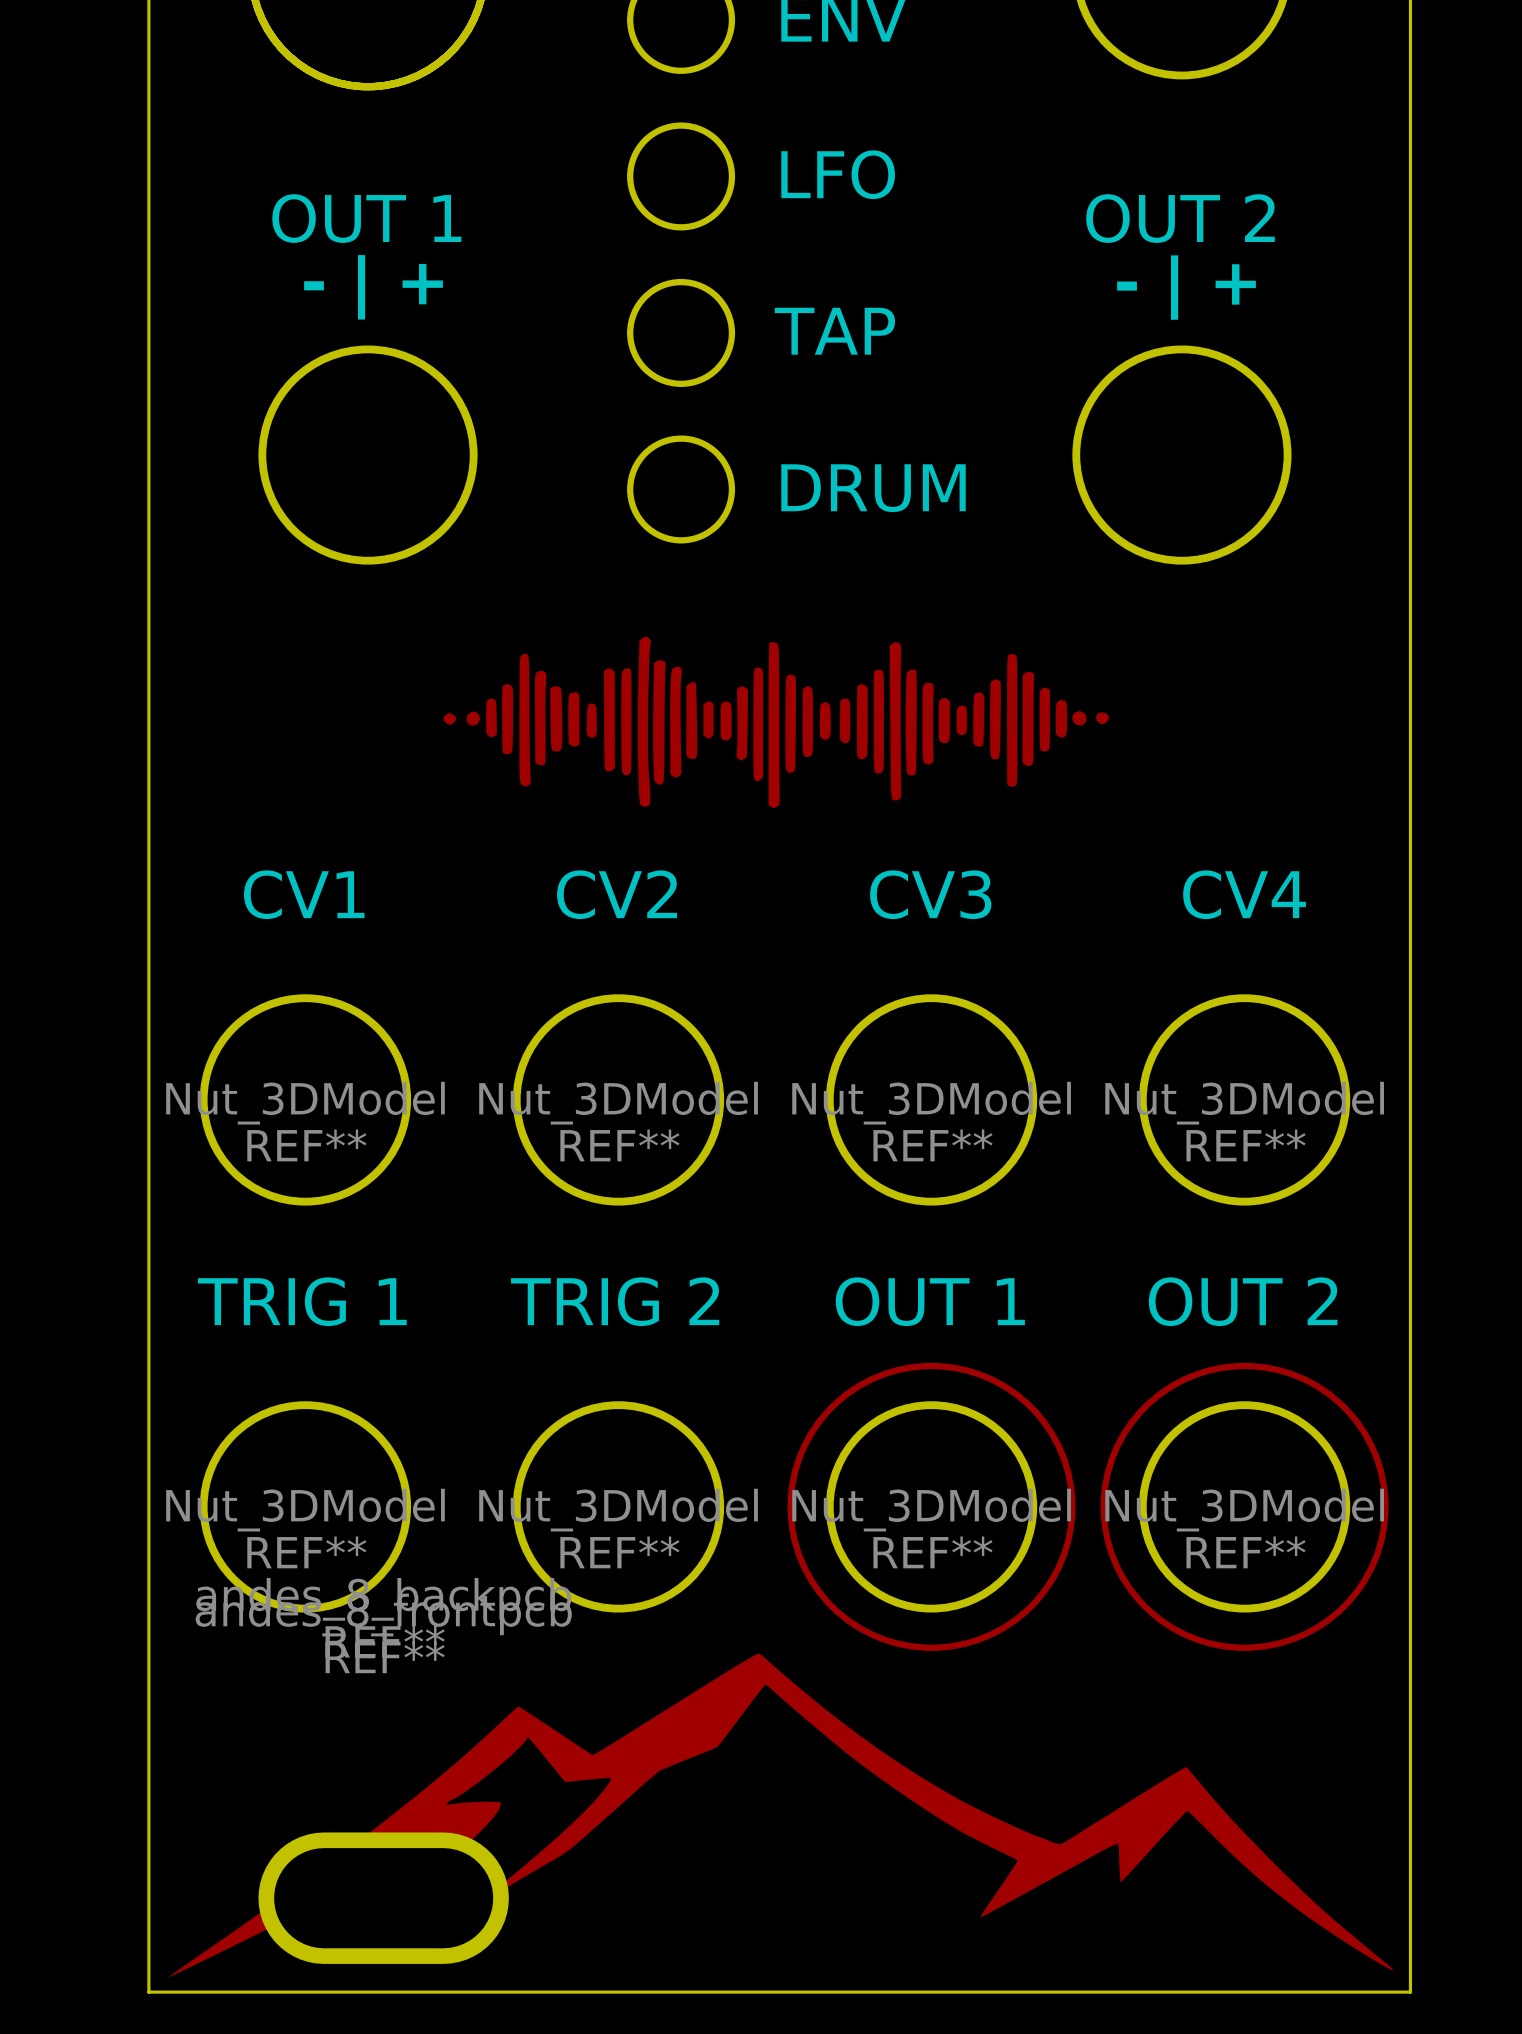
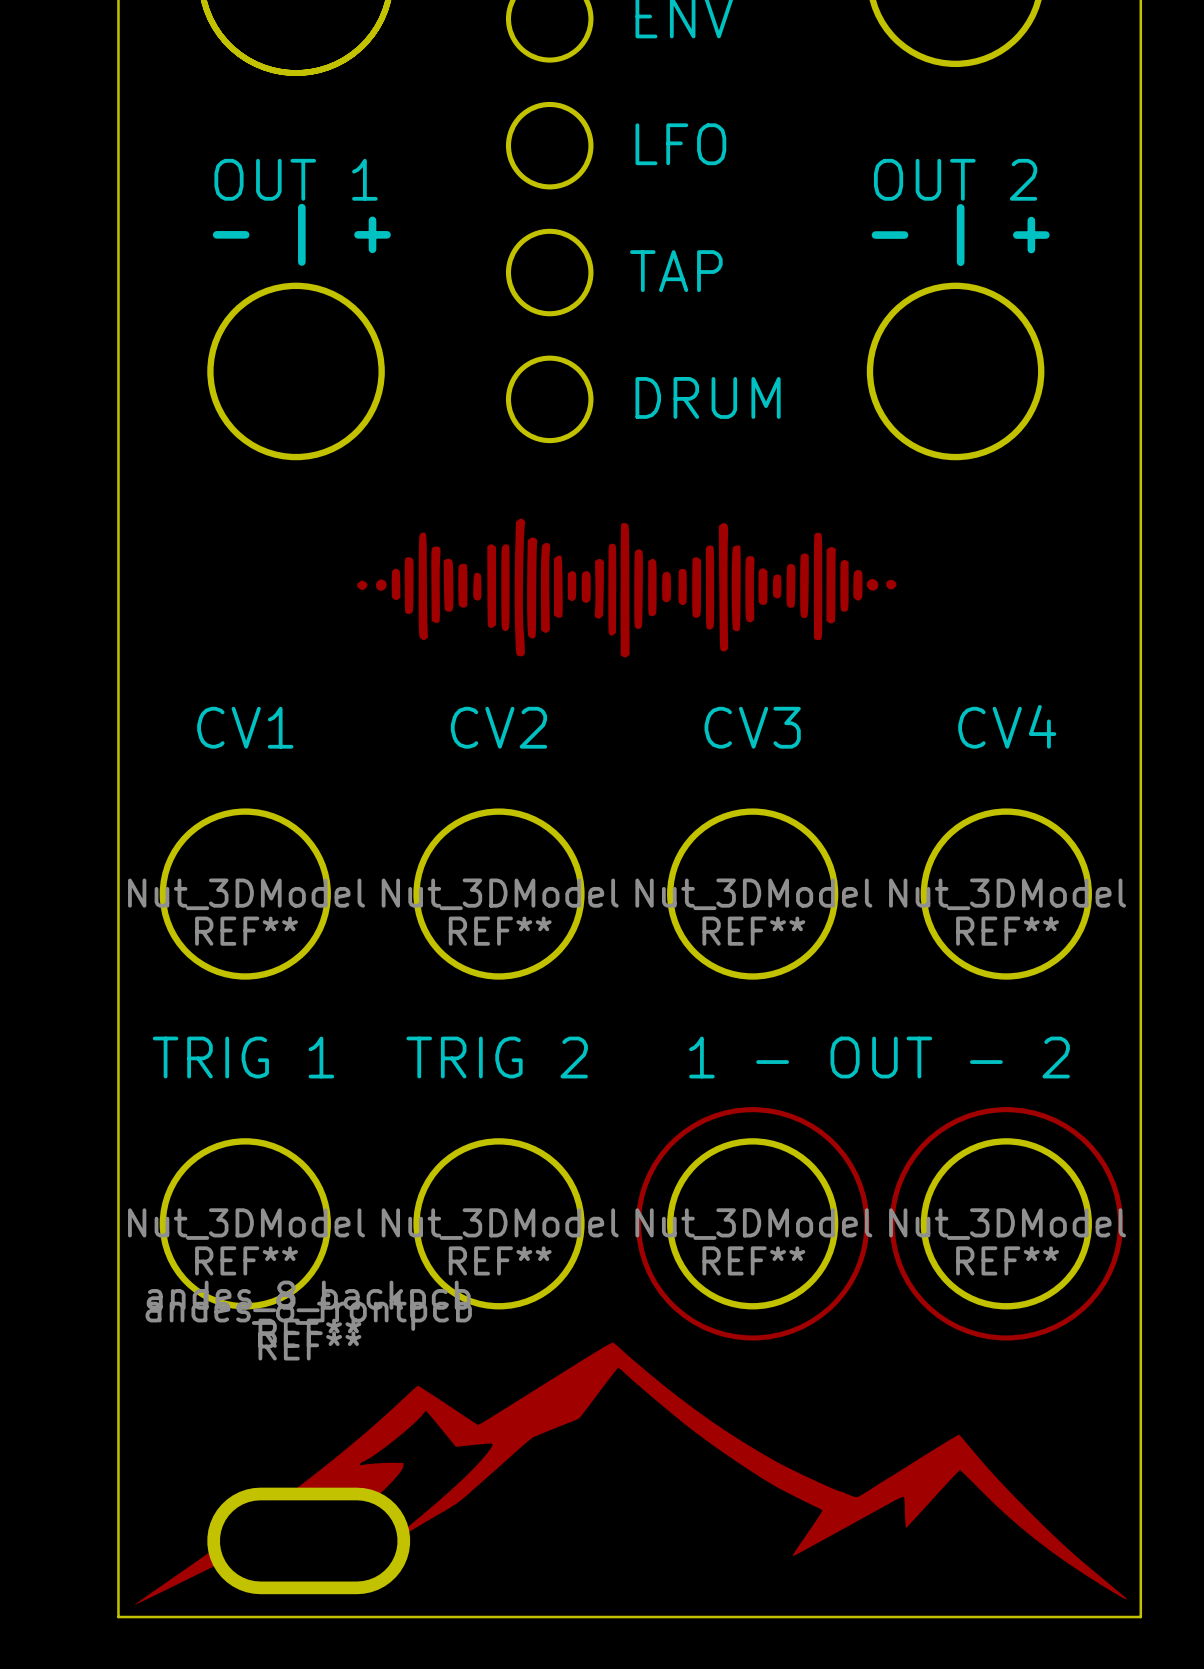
text: OUT 1 (930, 1301) -> none
text: OUT 2 (1243, 1301) -> 1 - OUT - 2 (879, 1057)

